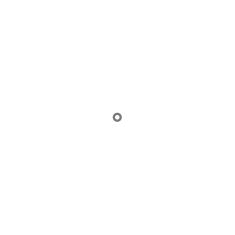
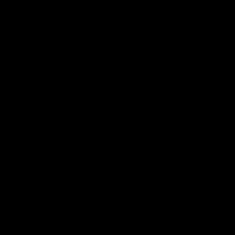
via: (117, 117) -> none

